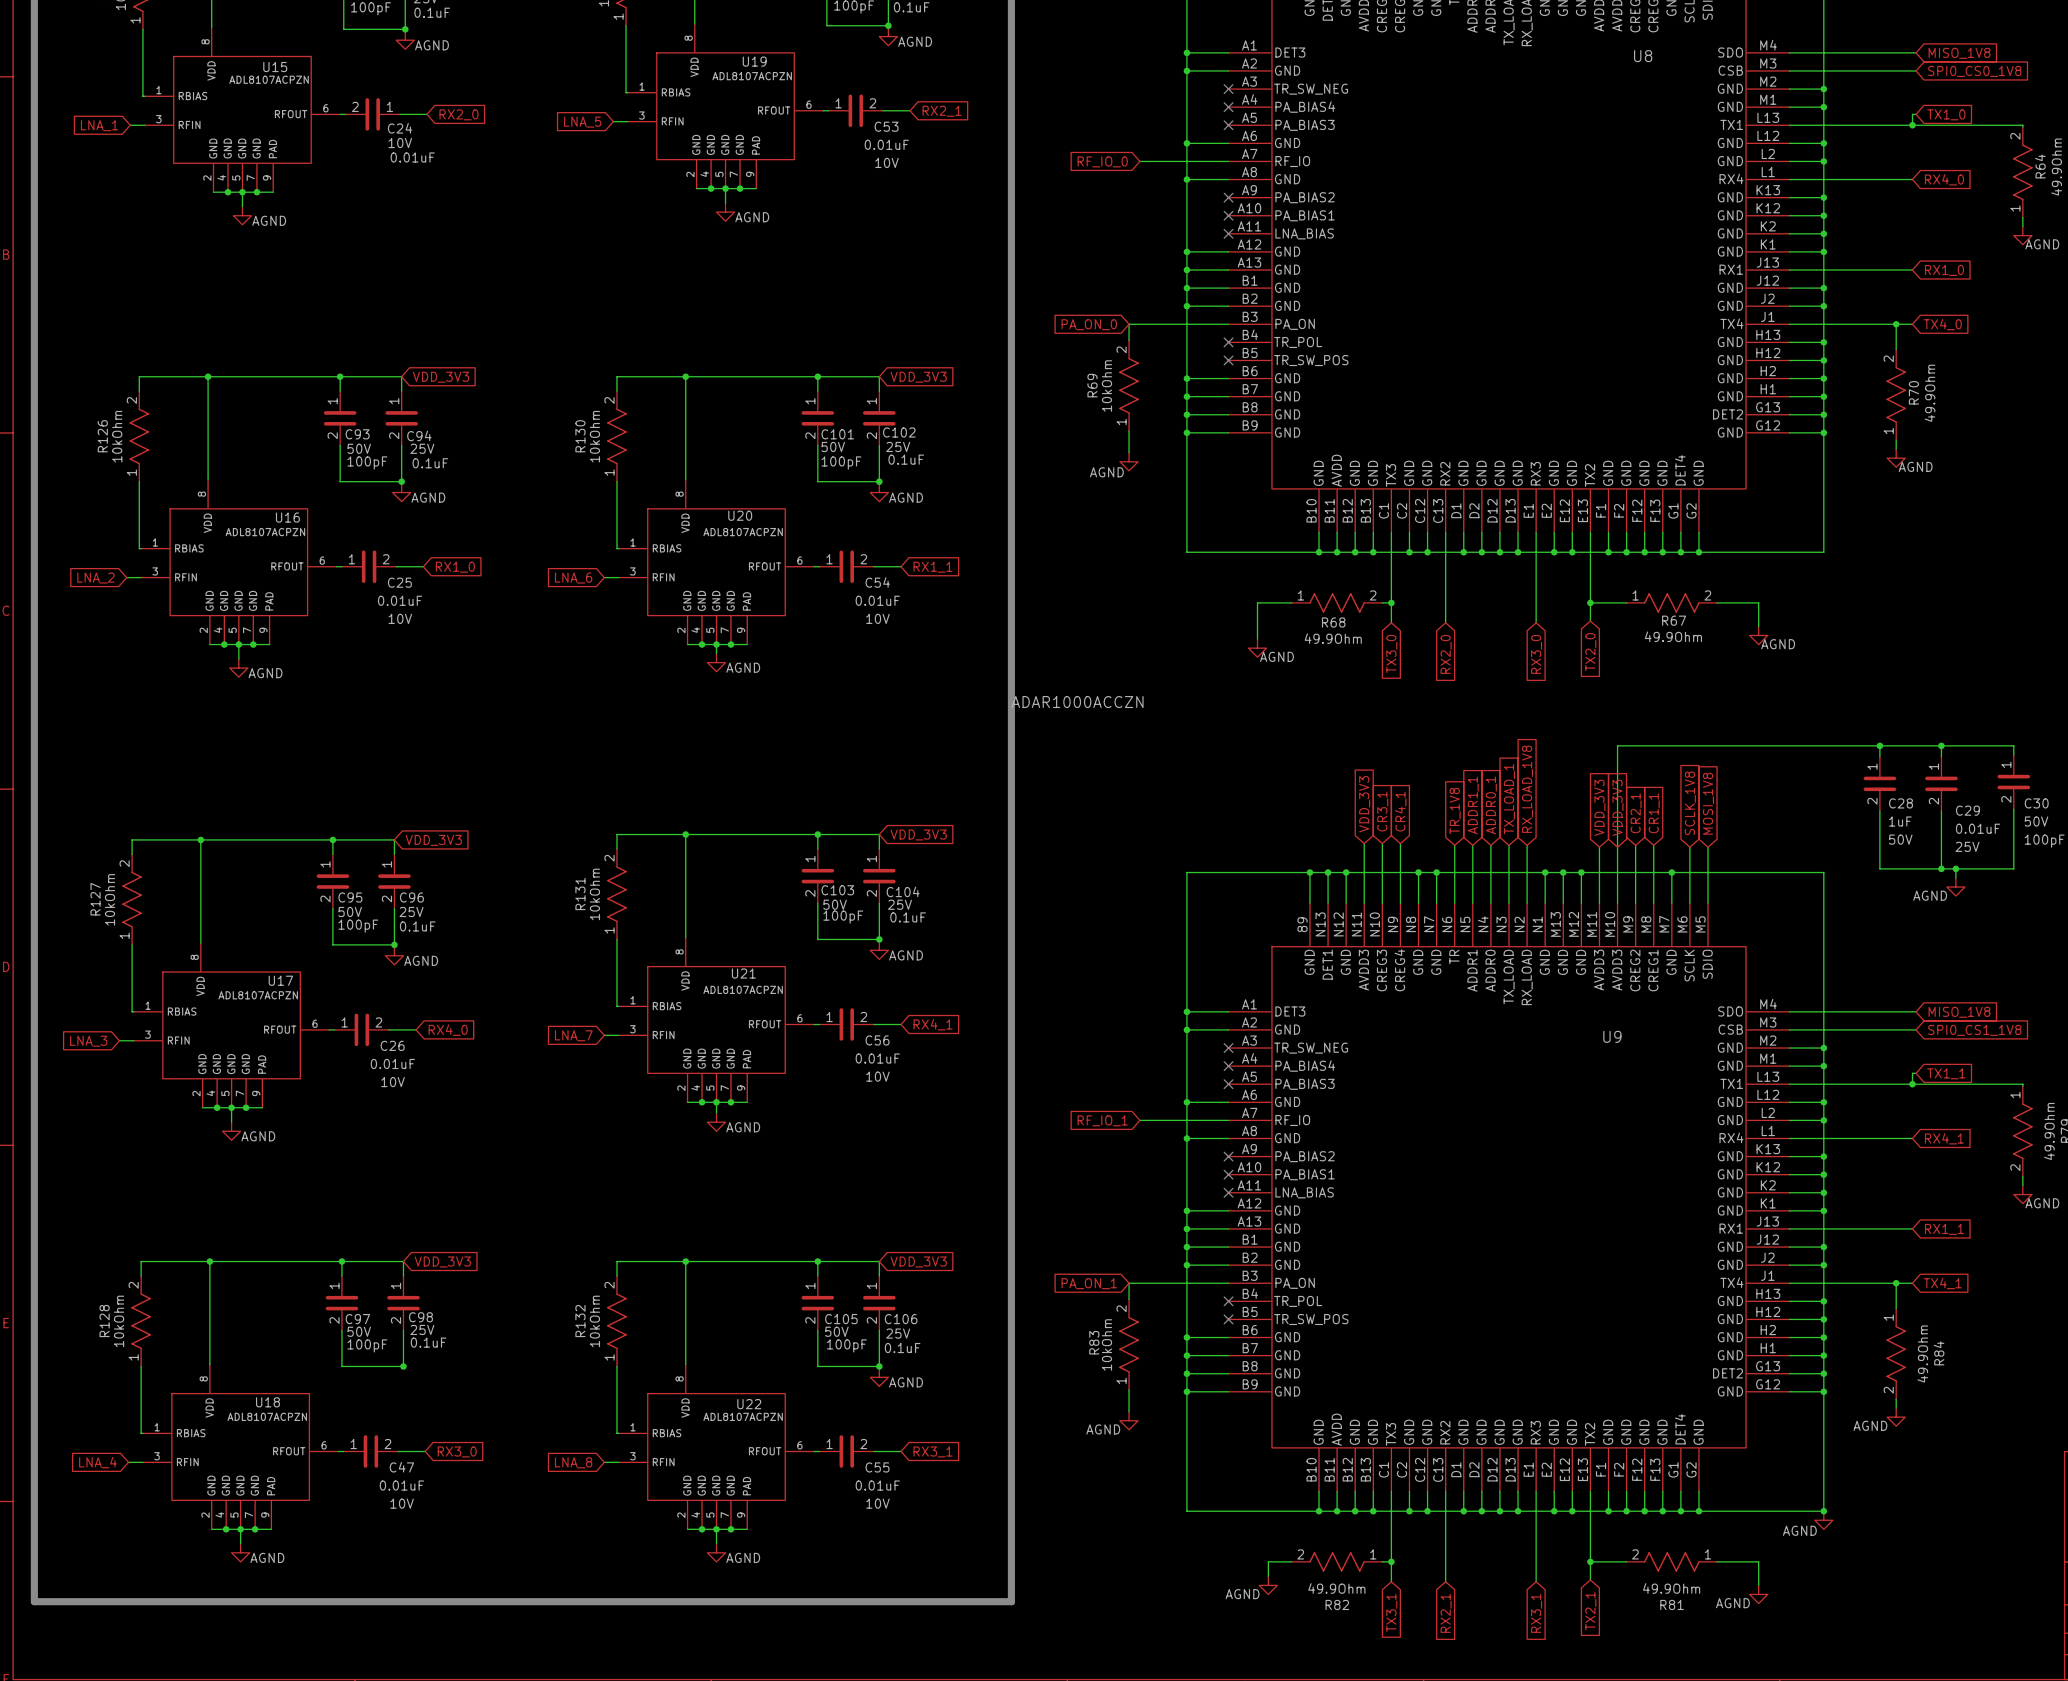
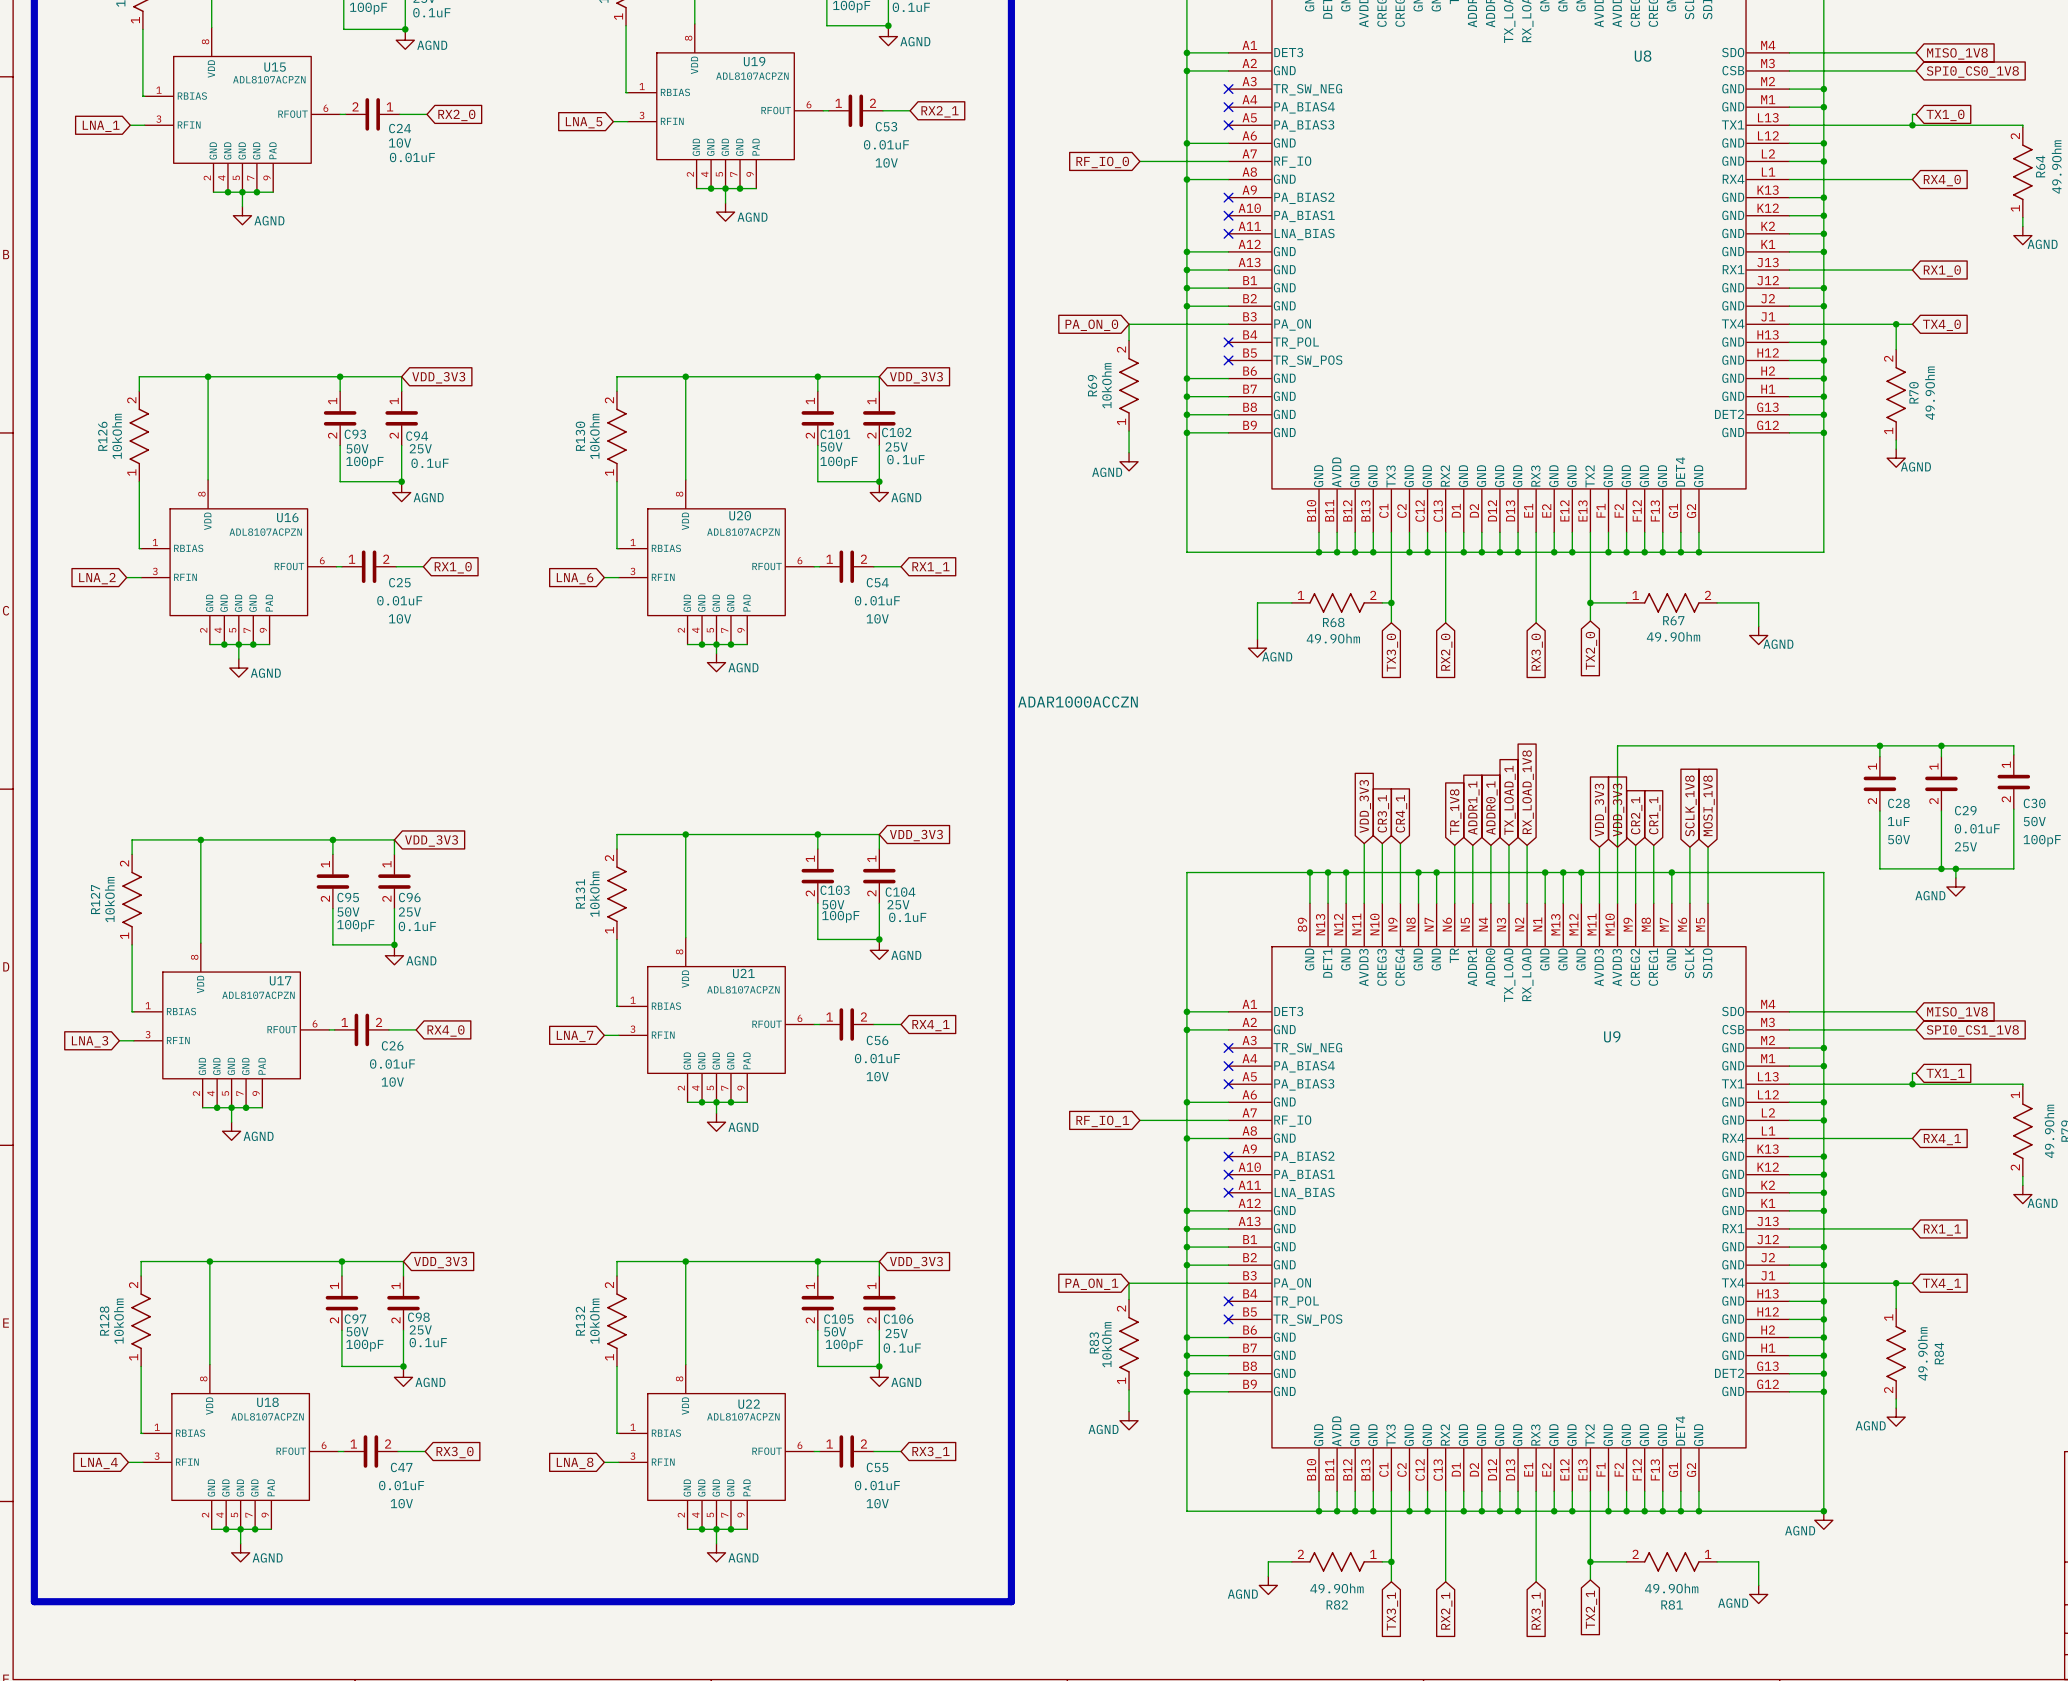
power symbol: none -> AGND (403, 1377)

